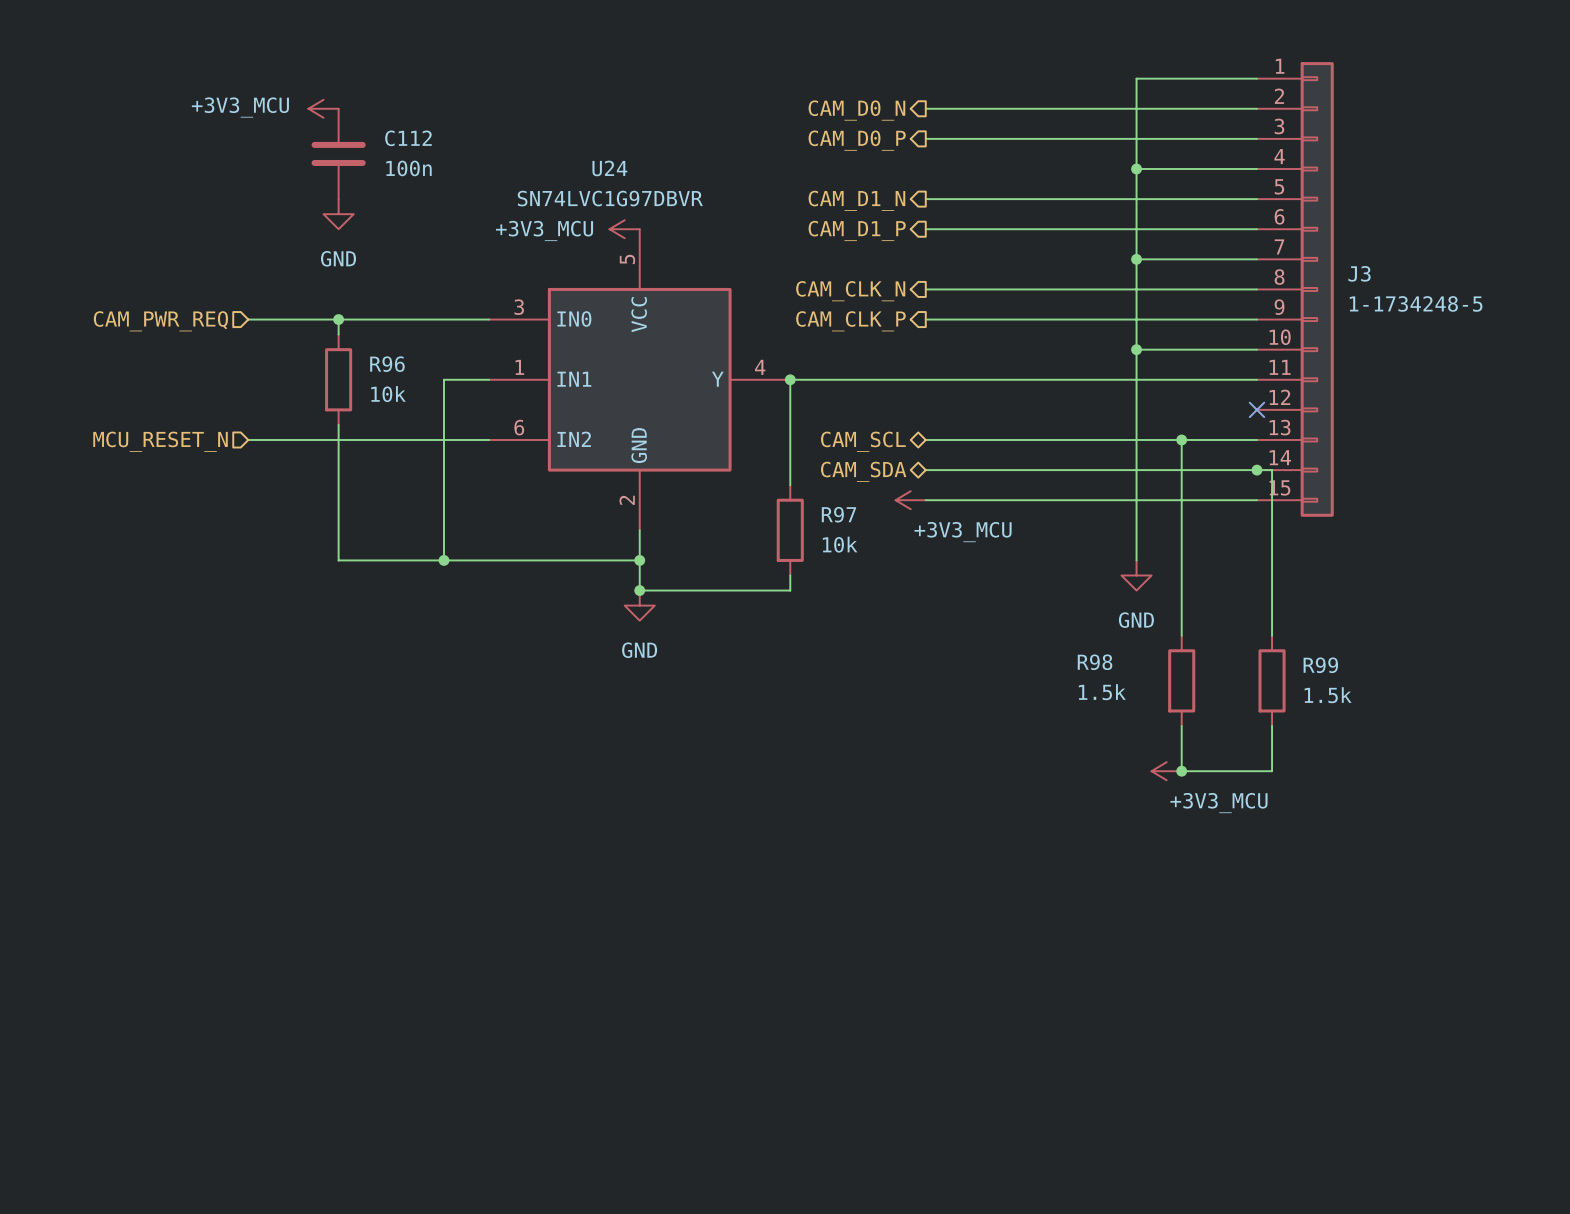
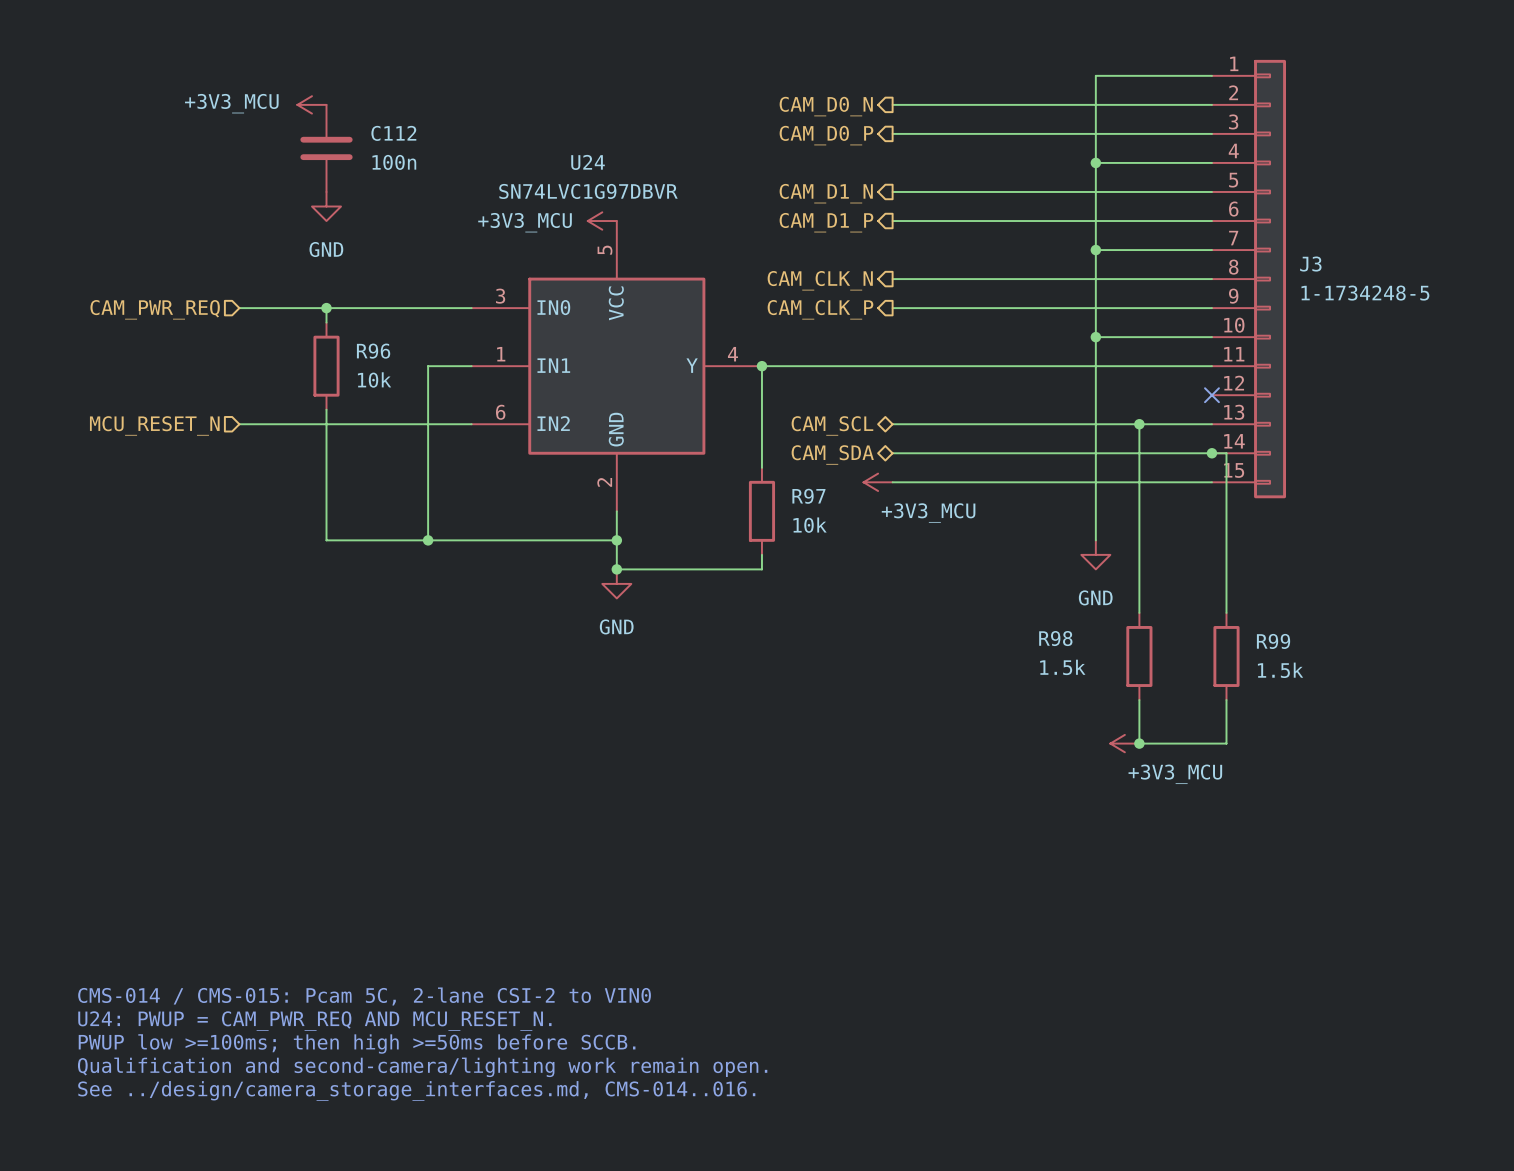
text: none -> CMS-014 / CMS-015: Pcam 5C, 2-lane CSI-2 to VIN0 (364, 996)
text: none -> U24: PWUP = CAM_PWR_REQ AND MCU_RESET_N. (314, 1021)
text: none -> PWUP low >=100ms; then high >=50ms before SCCB. (357, 1043)
text: none -> Qualification and second-camera/lighting work remain open. (422, 1067)
text: none -> See ../design/camera_storage_interfaces.md, CMS-014..016. (416, 1090)

